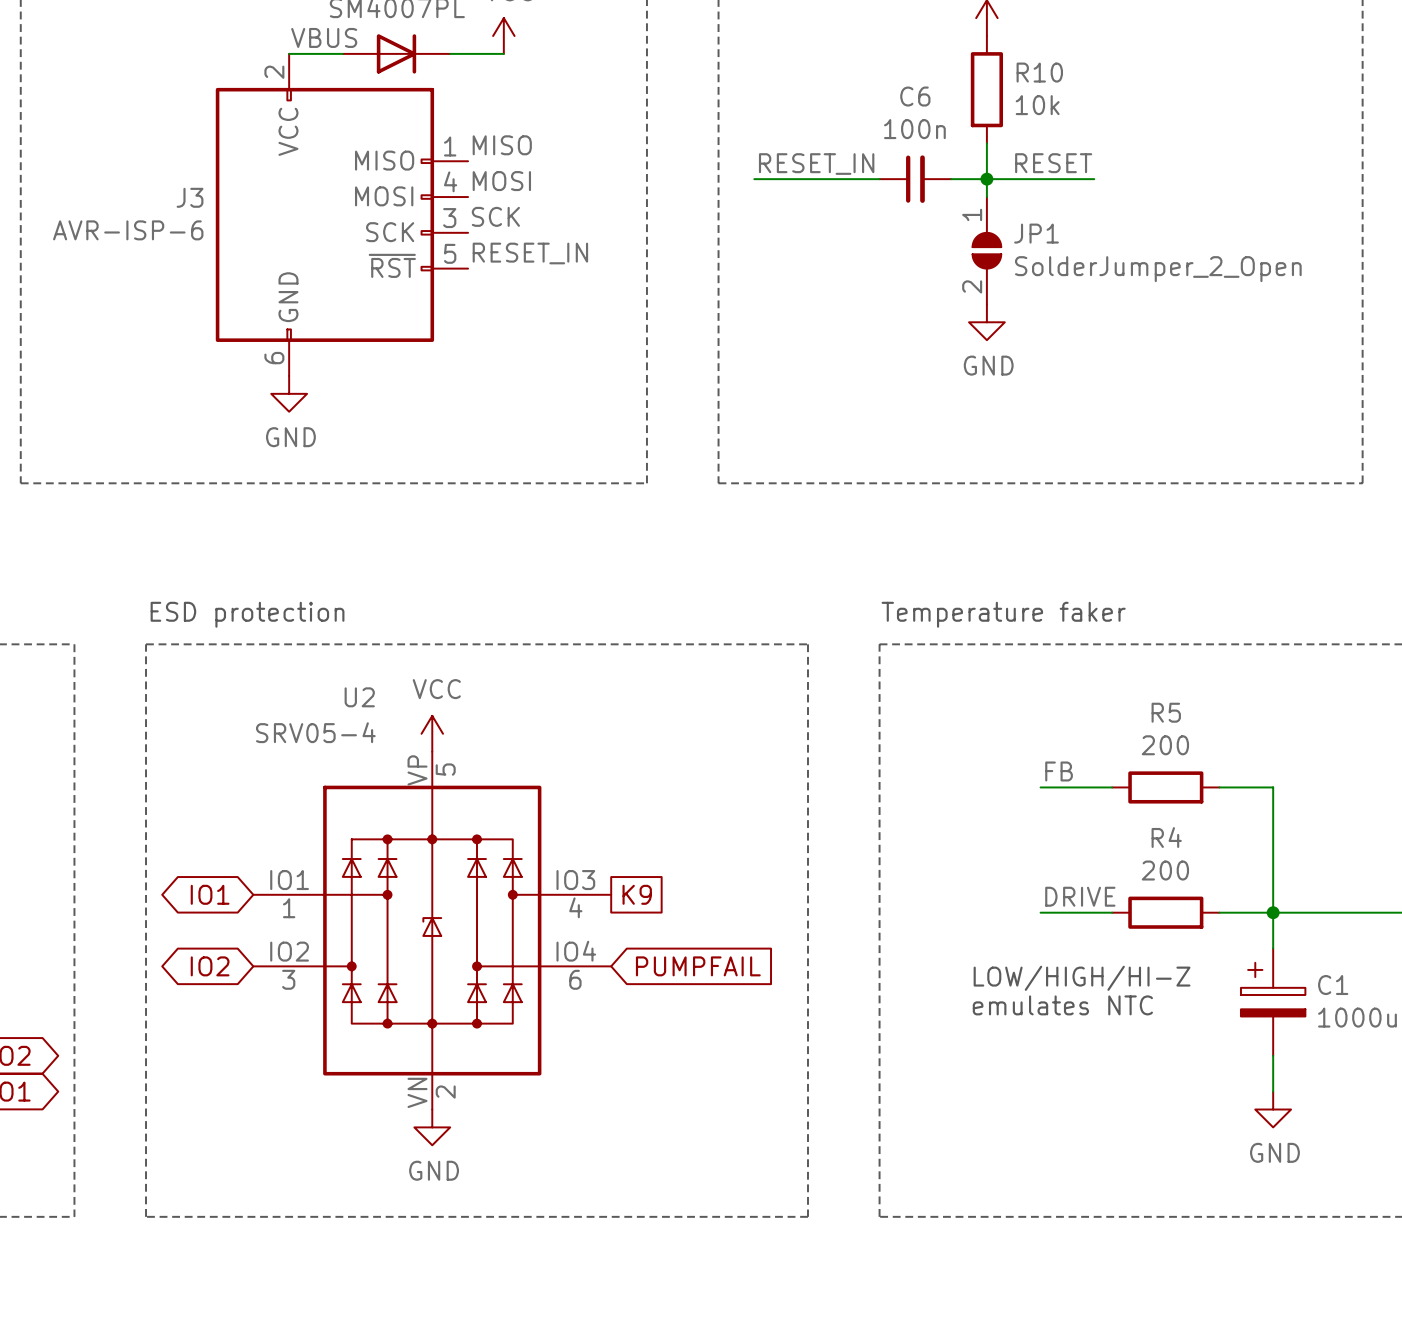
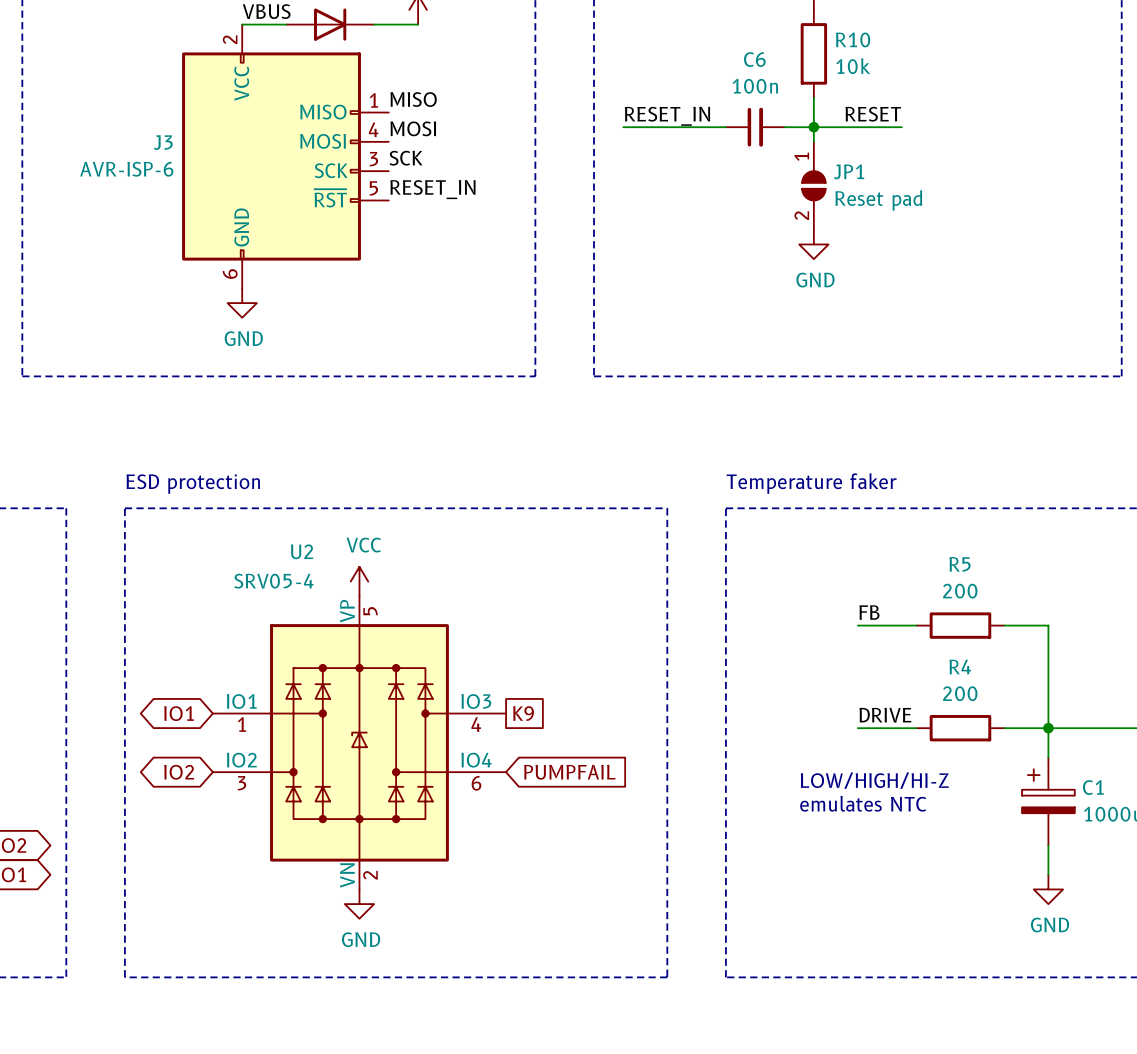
JP1 value: SolderJumper_2_Open (1158, 269) -> Reset pad (878, 200)

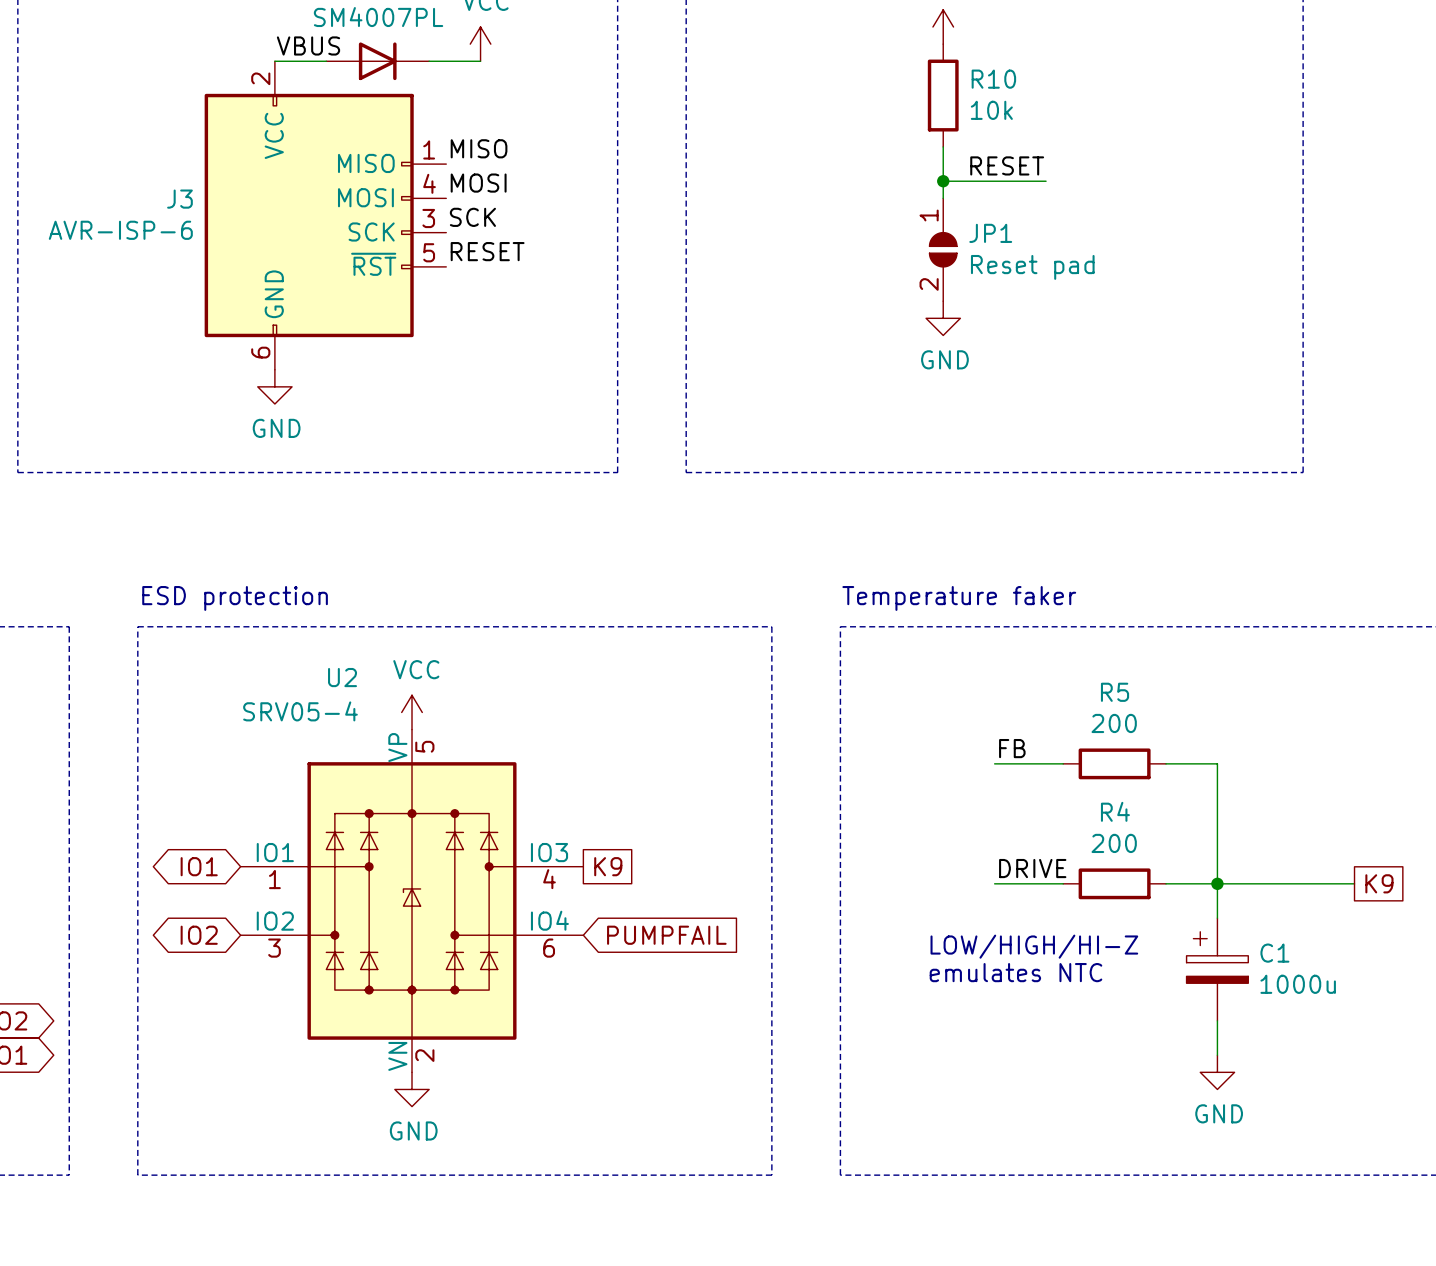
label: RESET_IN (667, 116) -> none
wire: (623, 127) (725, 127) -> none
C6: 100n (755, 127) -> none
wire: (784, 127) (813, 127) -> none
label: RESET_IN (432, 189) -> RESET (487, 251)

